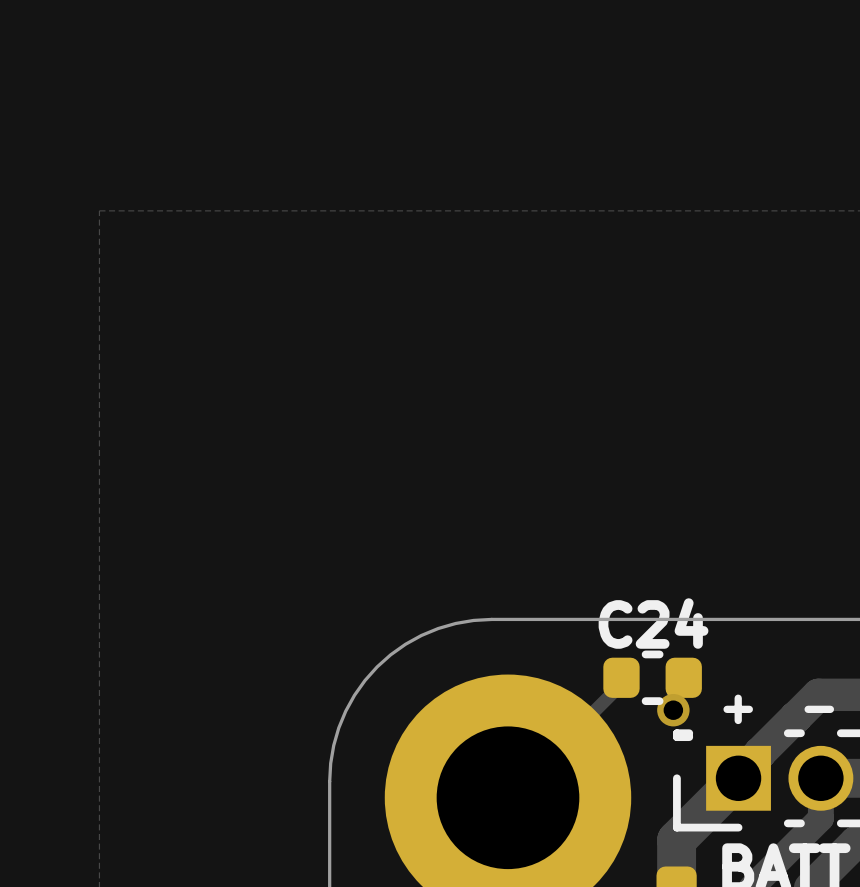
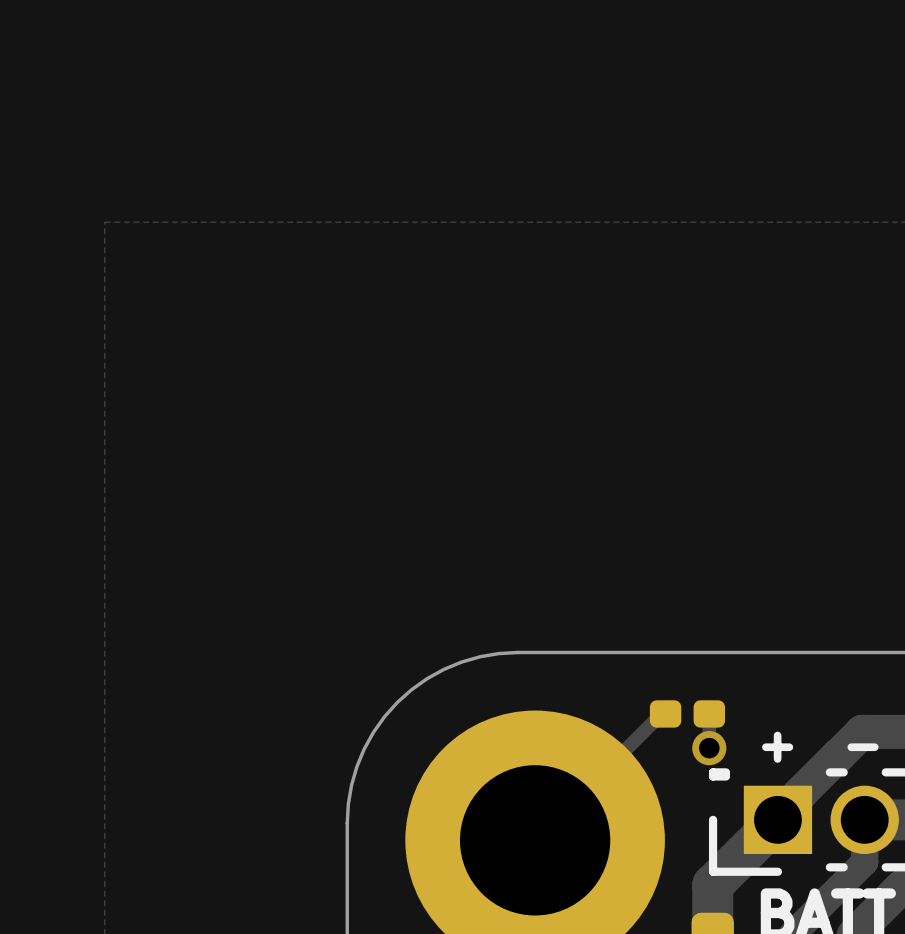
C24: (652, 677) -> none
part: none -> (687, 713)

